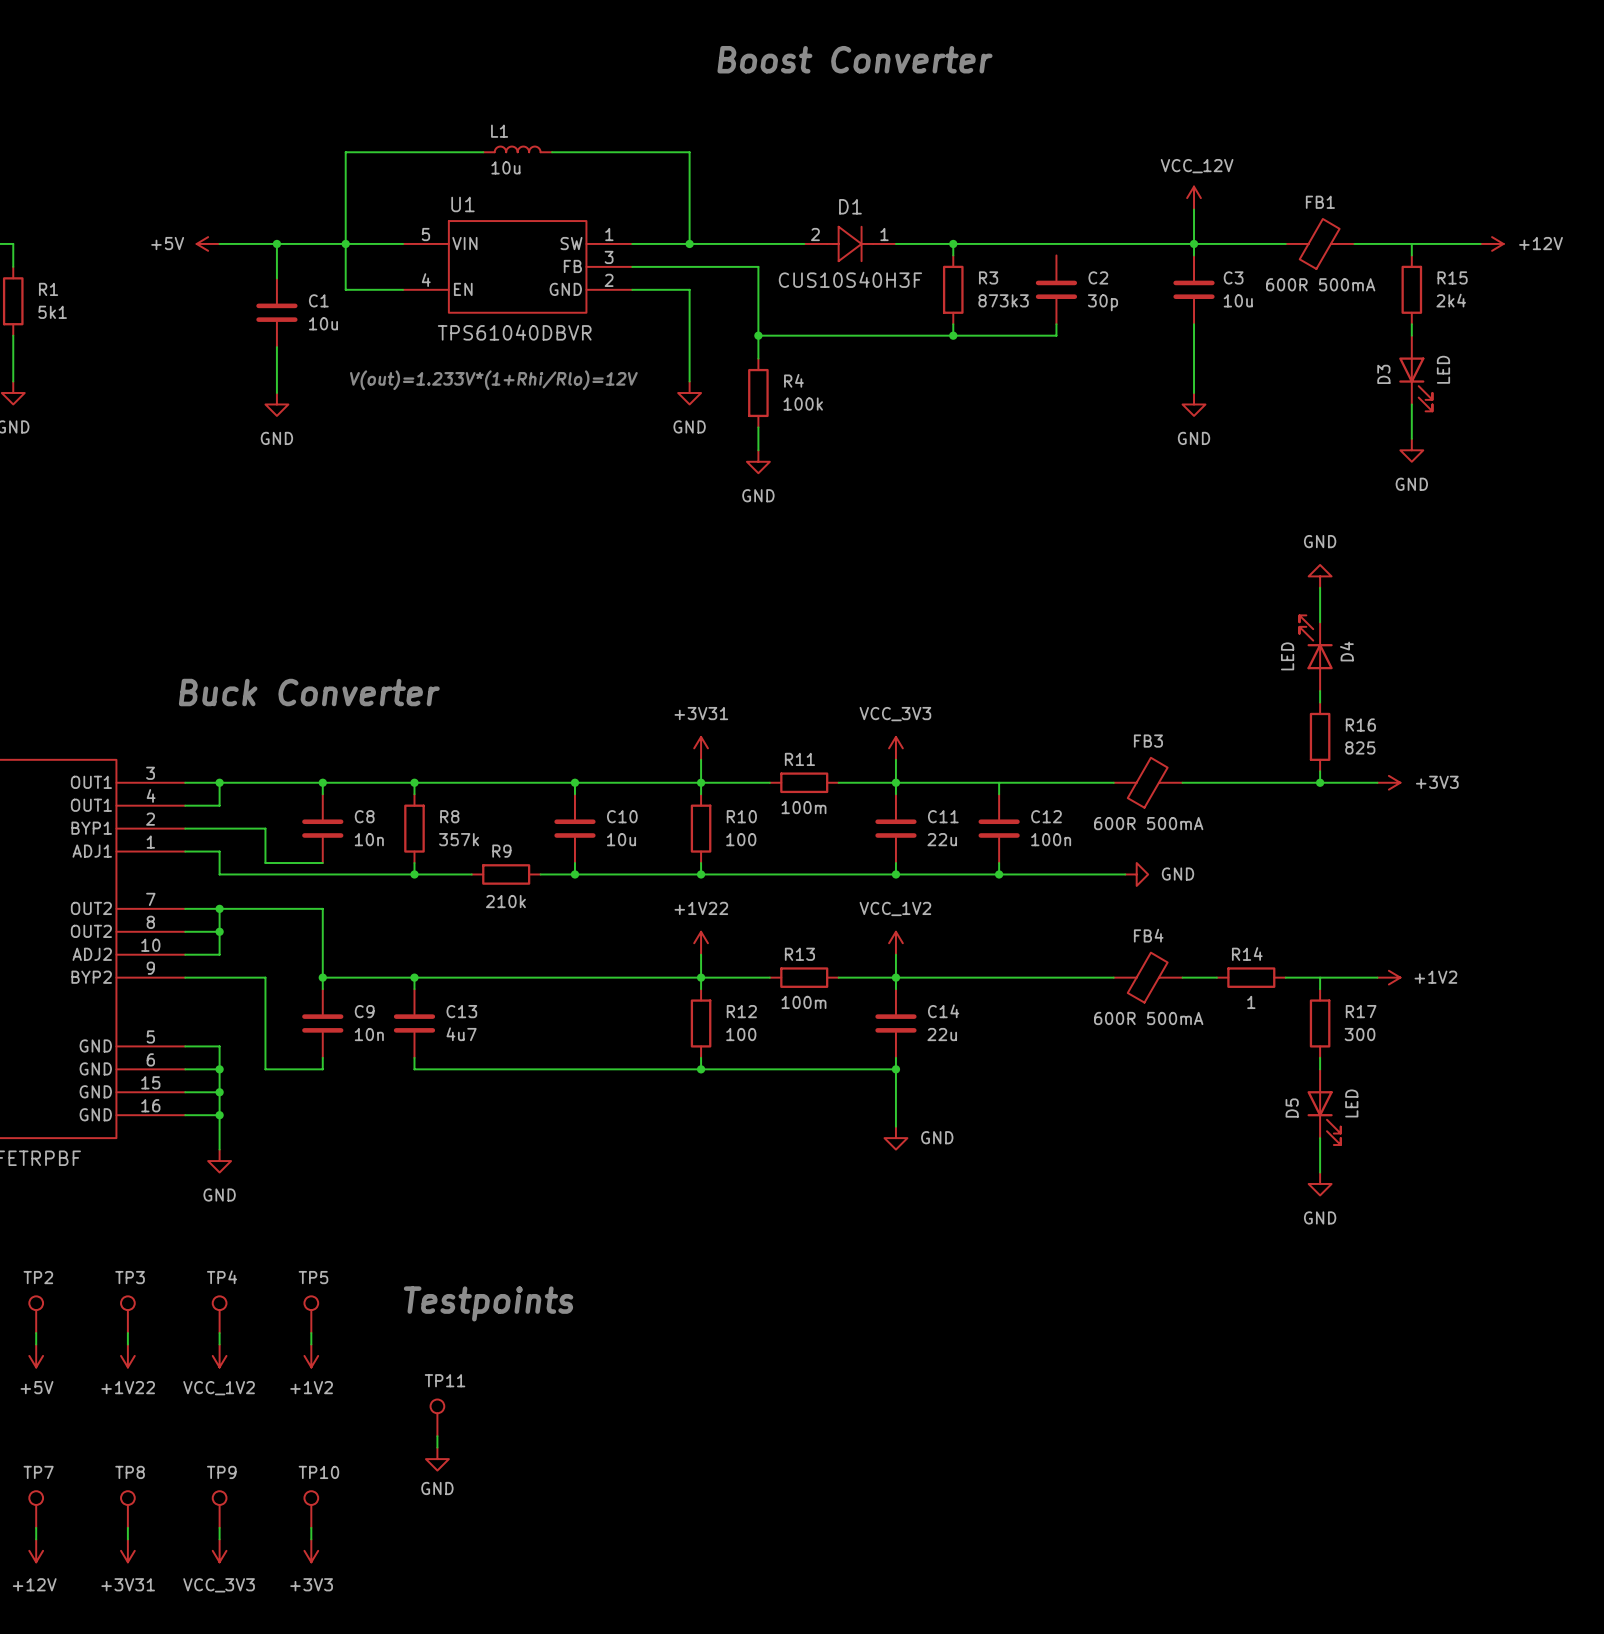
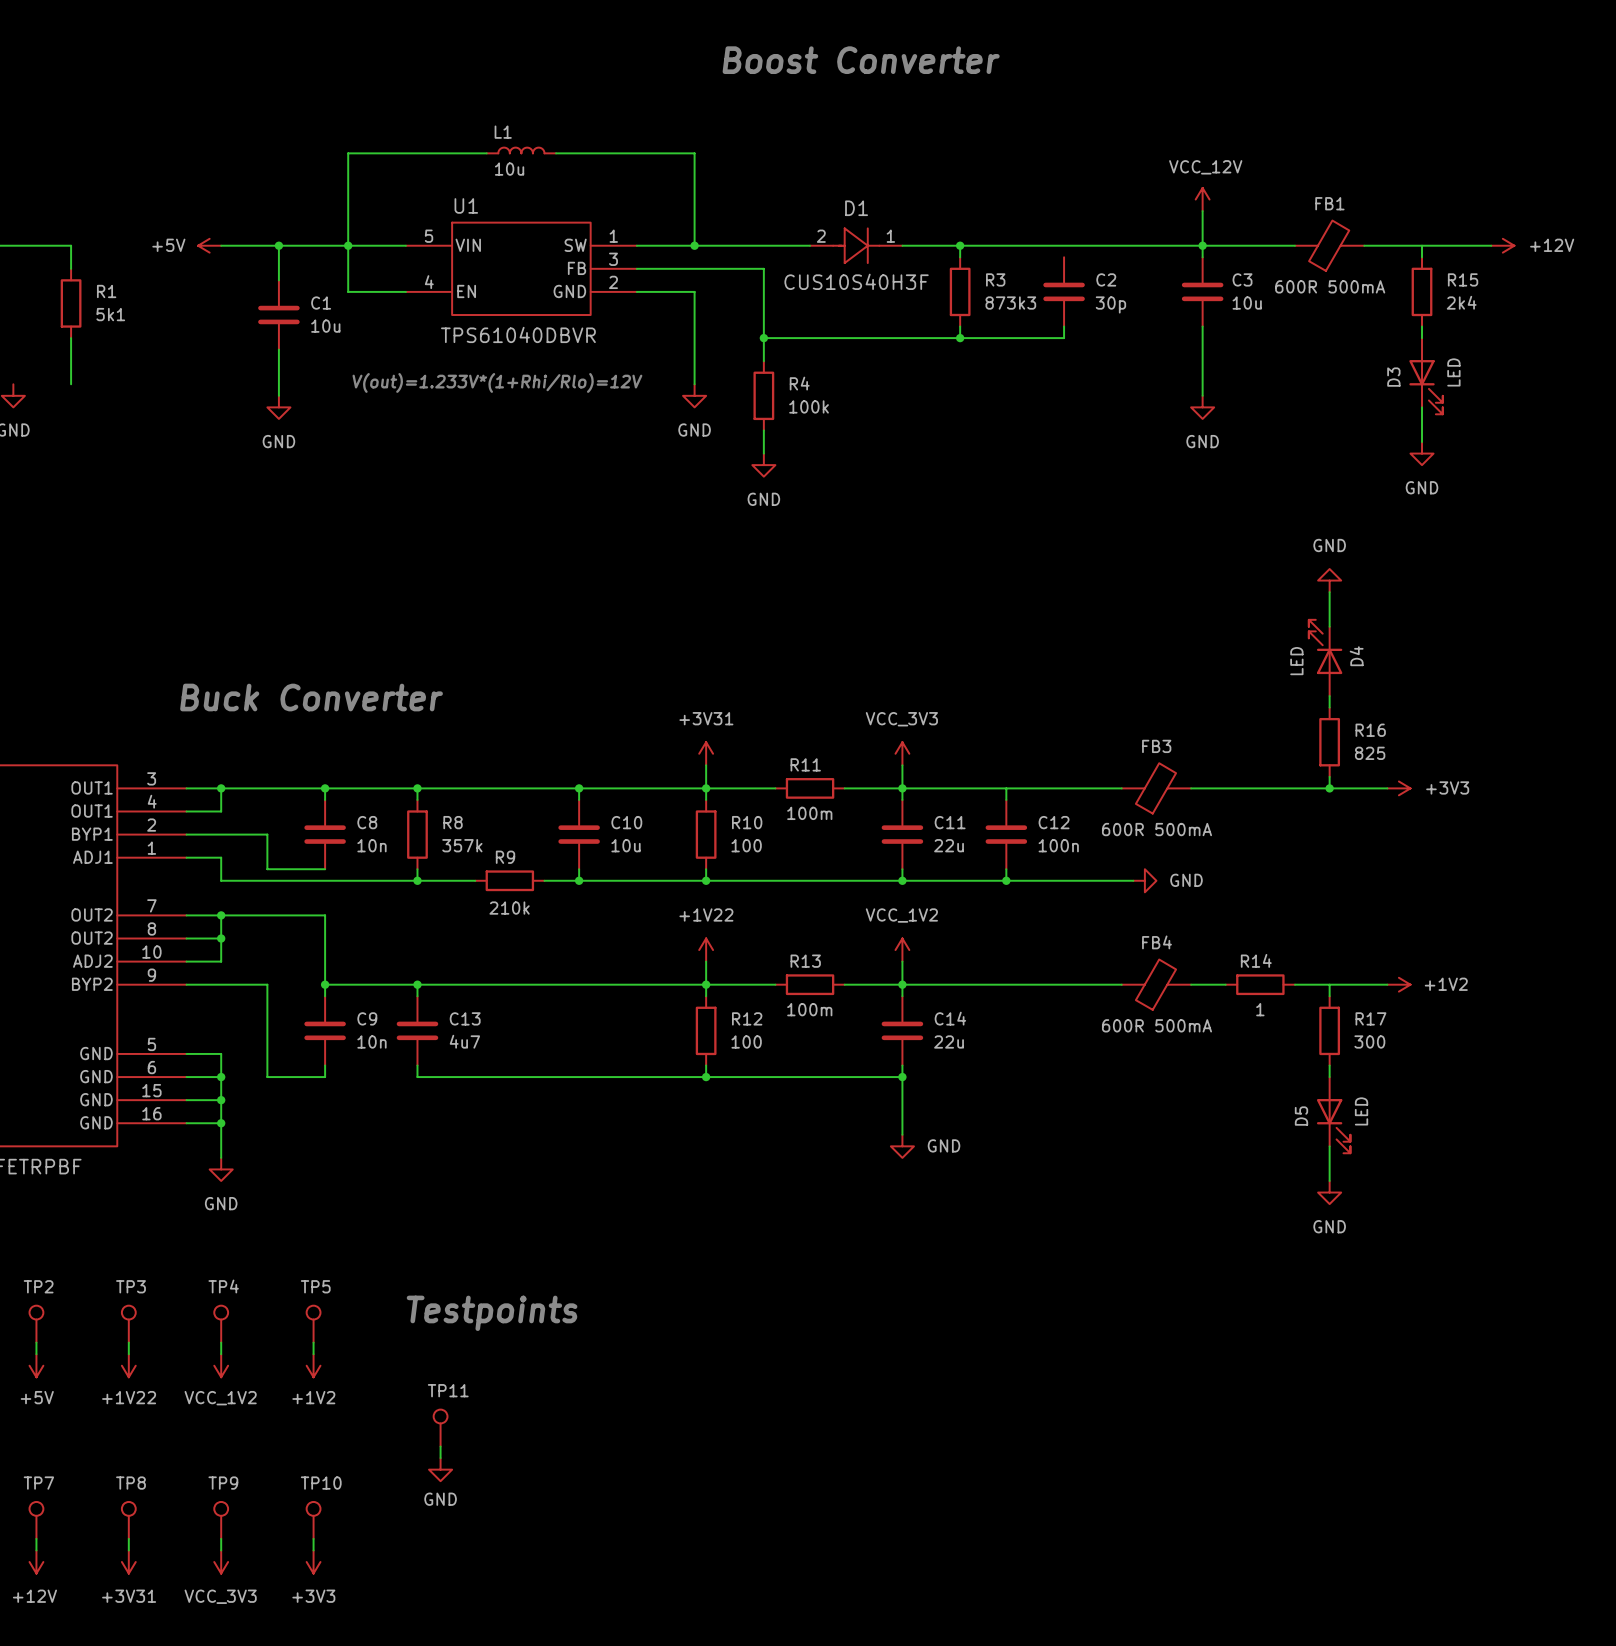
wire: (13, 243) (13, 266) -> (13, 245) (71, 245) (71, 268)
R1 position: (13, 301) -> (71, 303)
wire: (13, 335) (13, 381) -> (71, 338) (71, 384)

